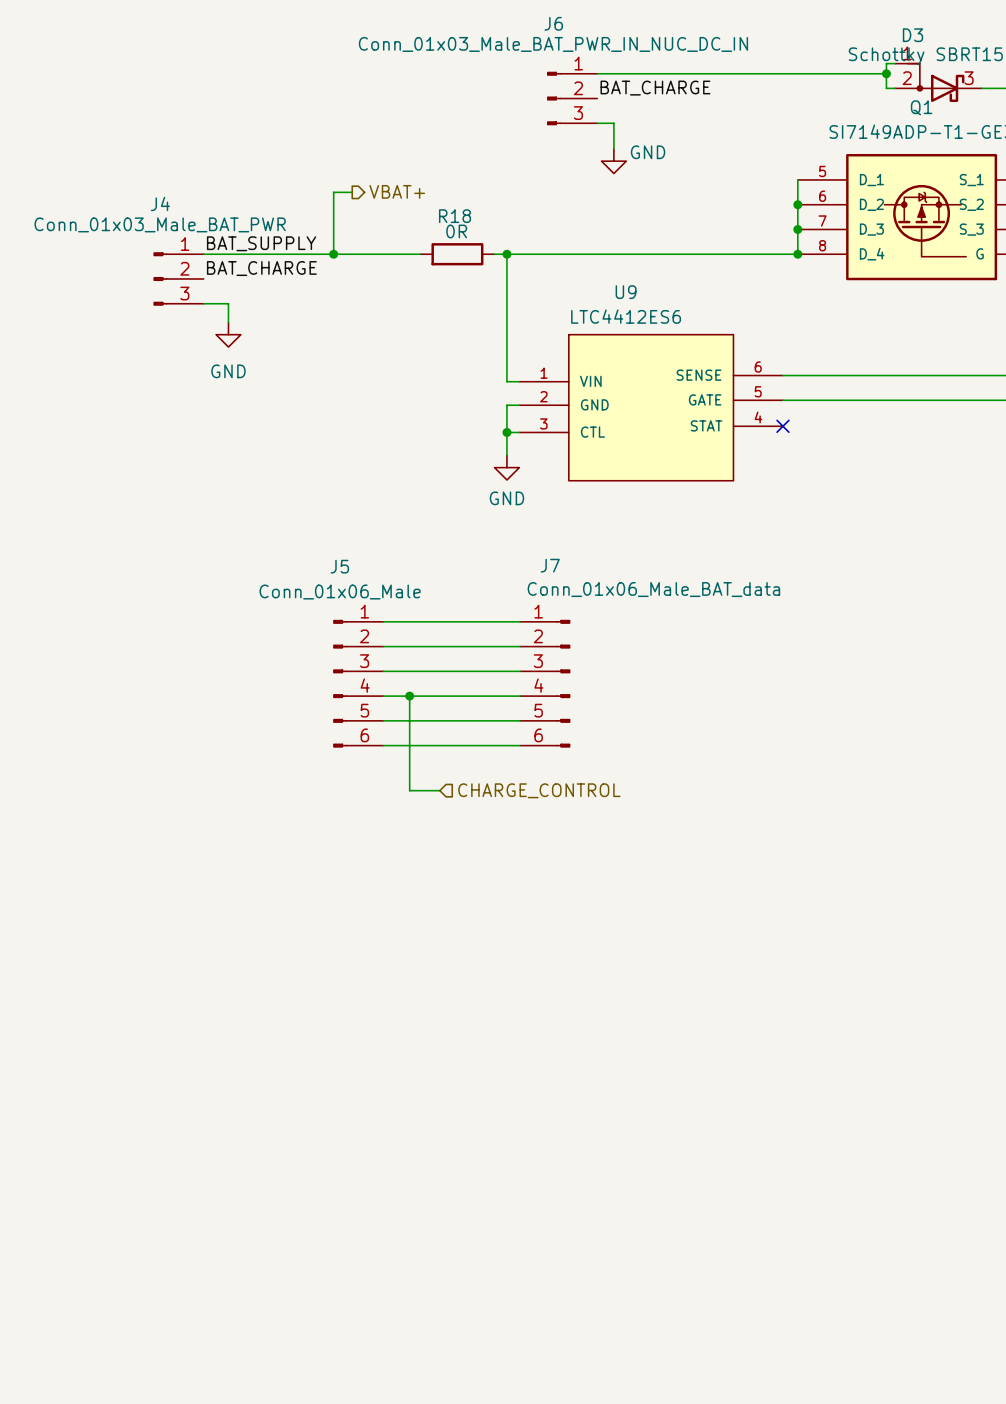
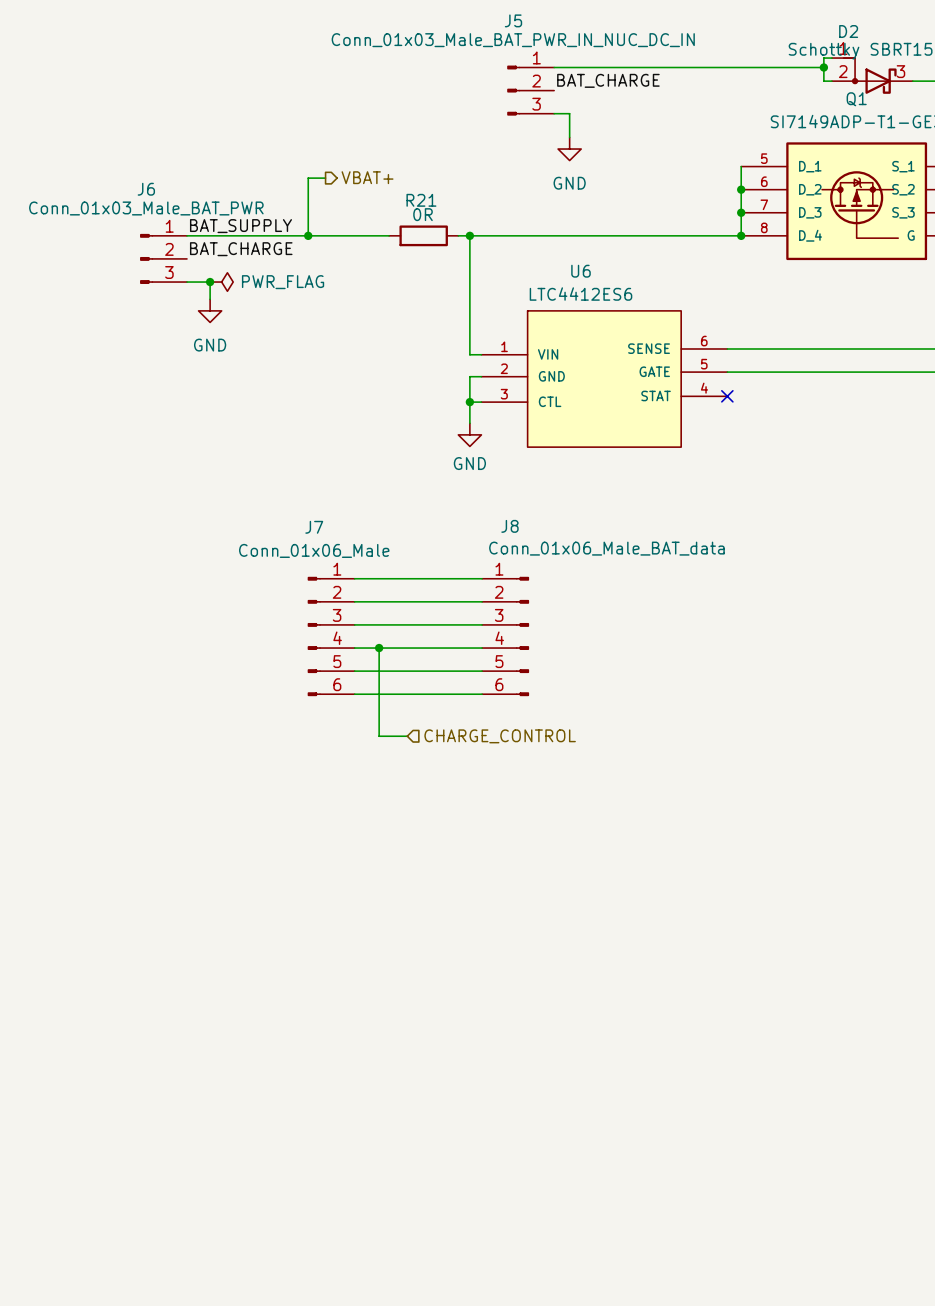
J6 name: J6 (553, 23) -> J5 (513, 20)
D3 name: D3 (912, 35) -> D2 (848, 31)
power symbol text position: GND (648, 152) -> GND (569, 183)
J4 name: J4 (160, 203) -> J6 (146, 189)
R18 name: R18 (455, 216) -> R21 (421, 200)
U9 name: U9 (626, 292) -> U6 (581, 271)
junction: none -> (210, 282)
power symbol: none -> PWR_FLAG (221, 282)
J7 name: J7 (550, 565) -> J8 (509, 526)
J5 name: J5 (339, 566) -> J7 (314, 527)

